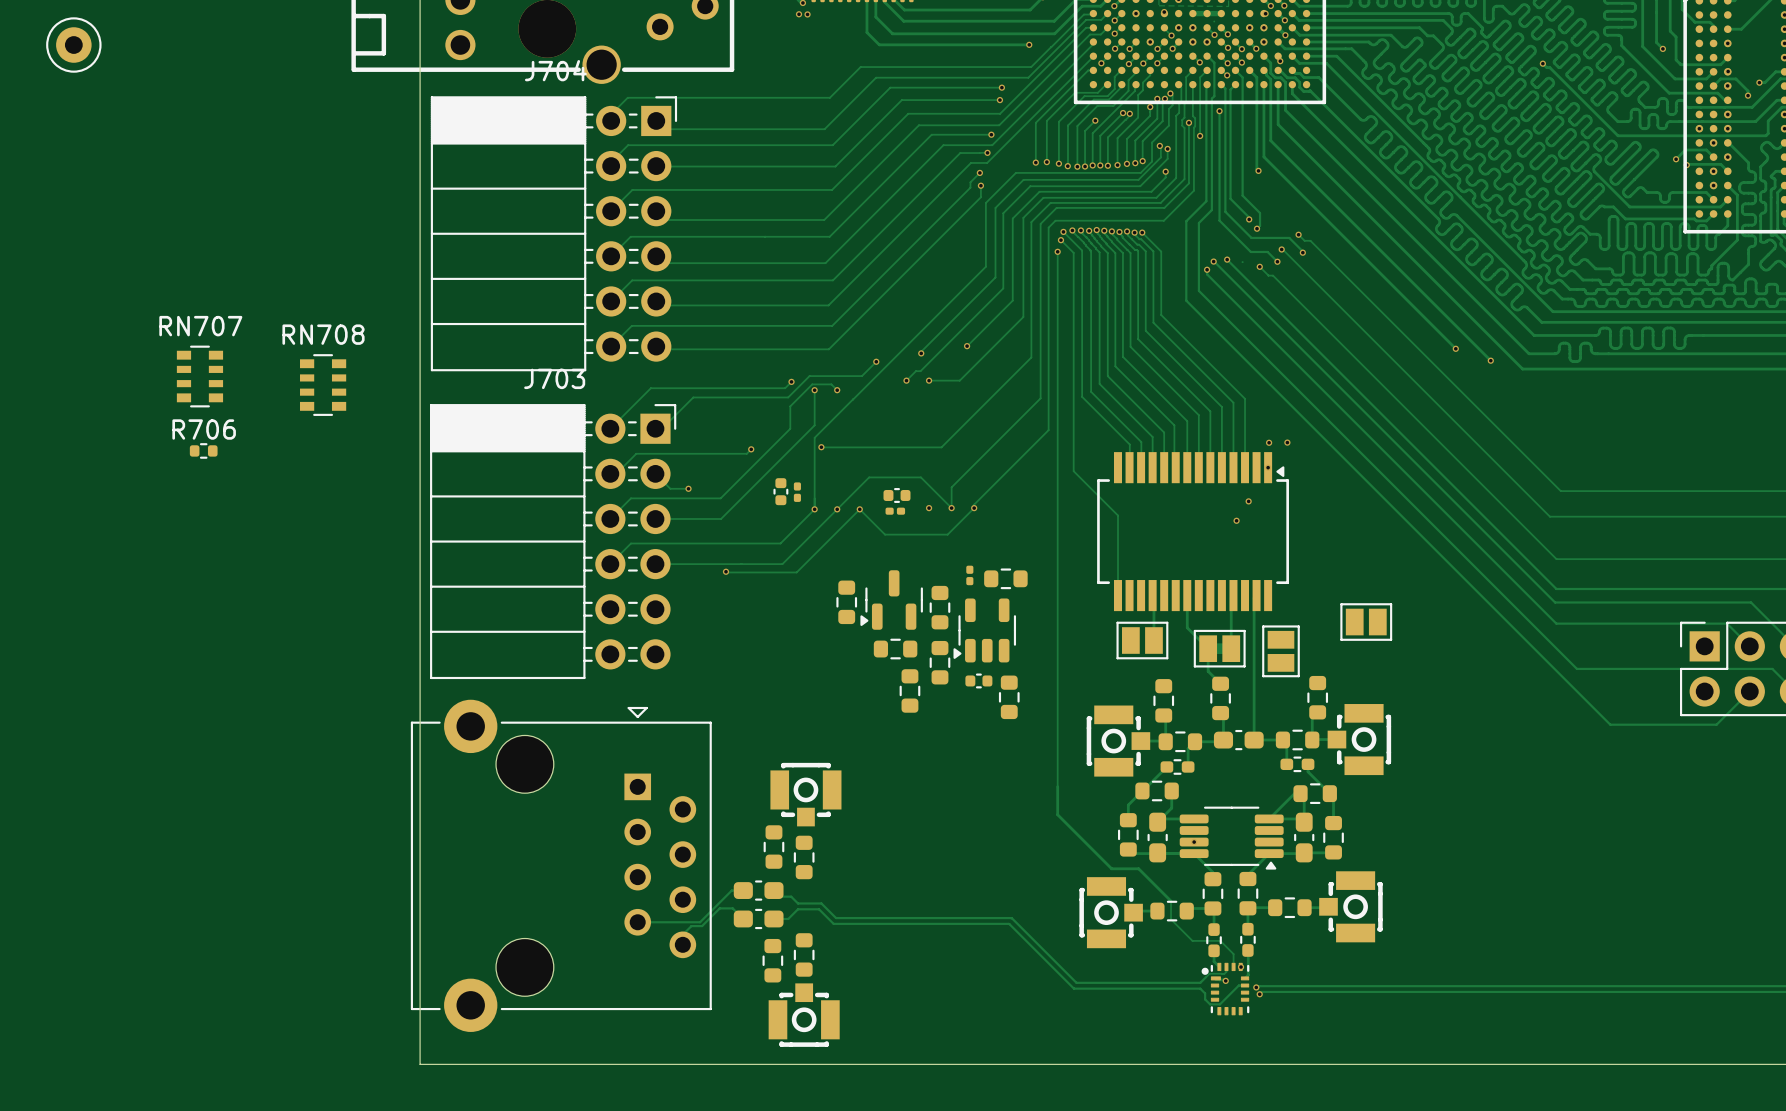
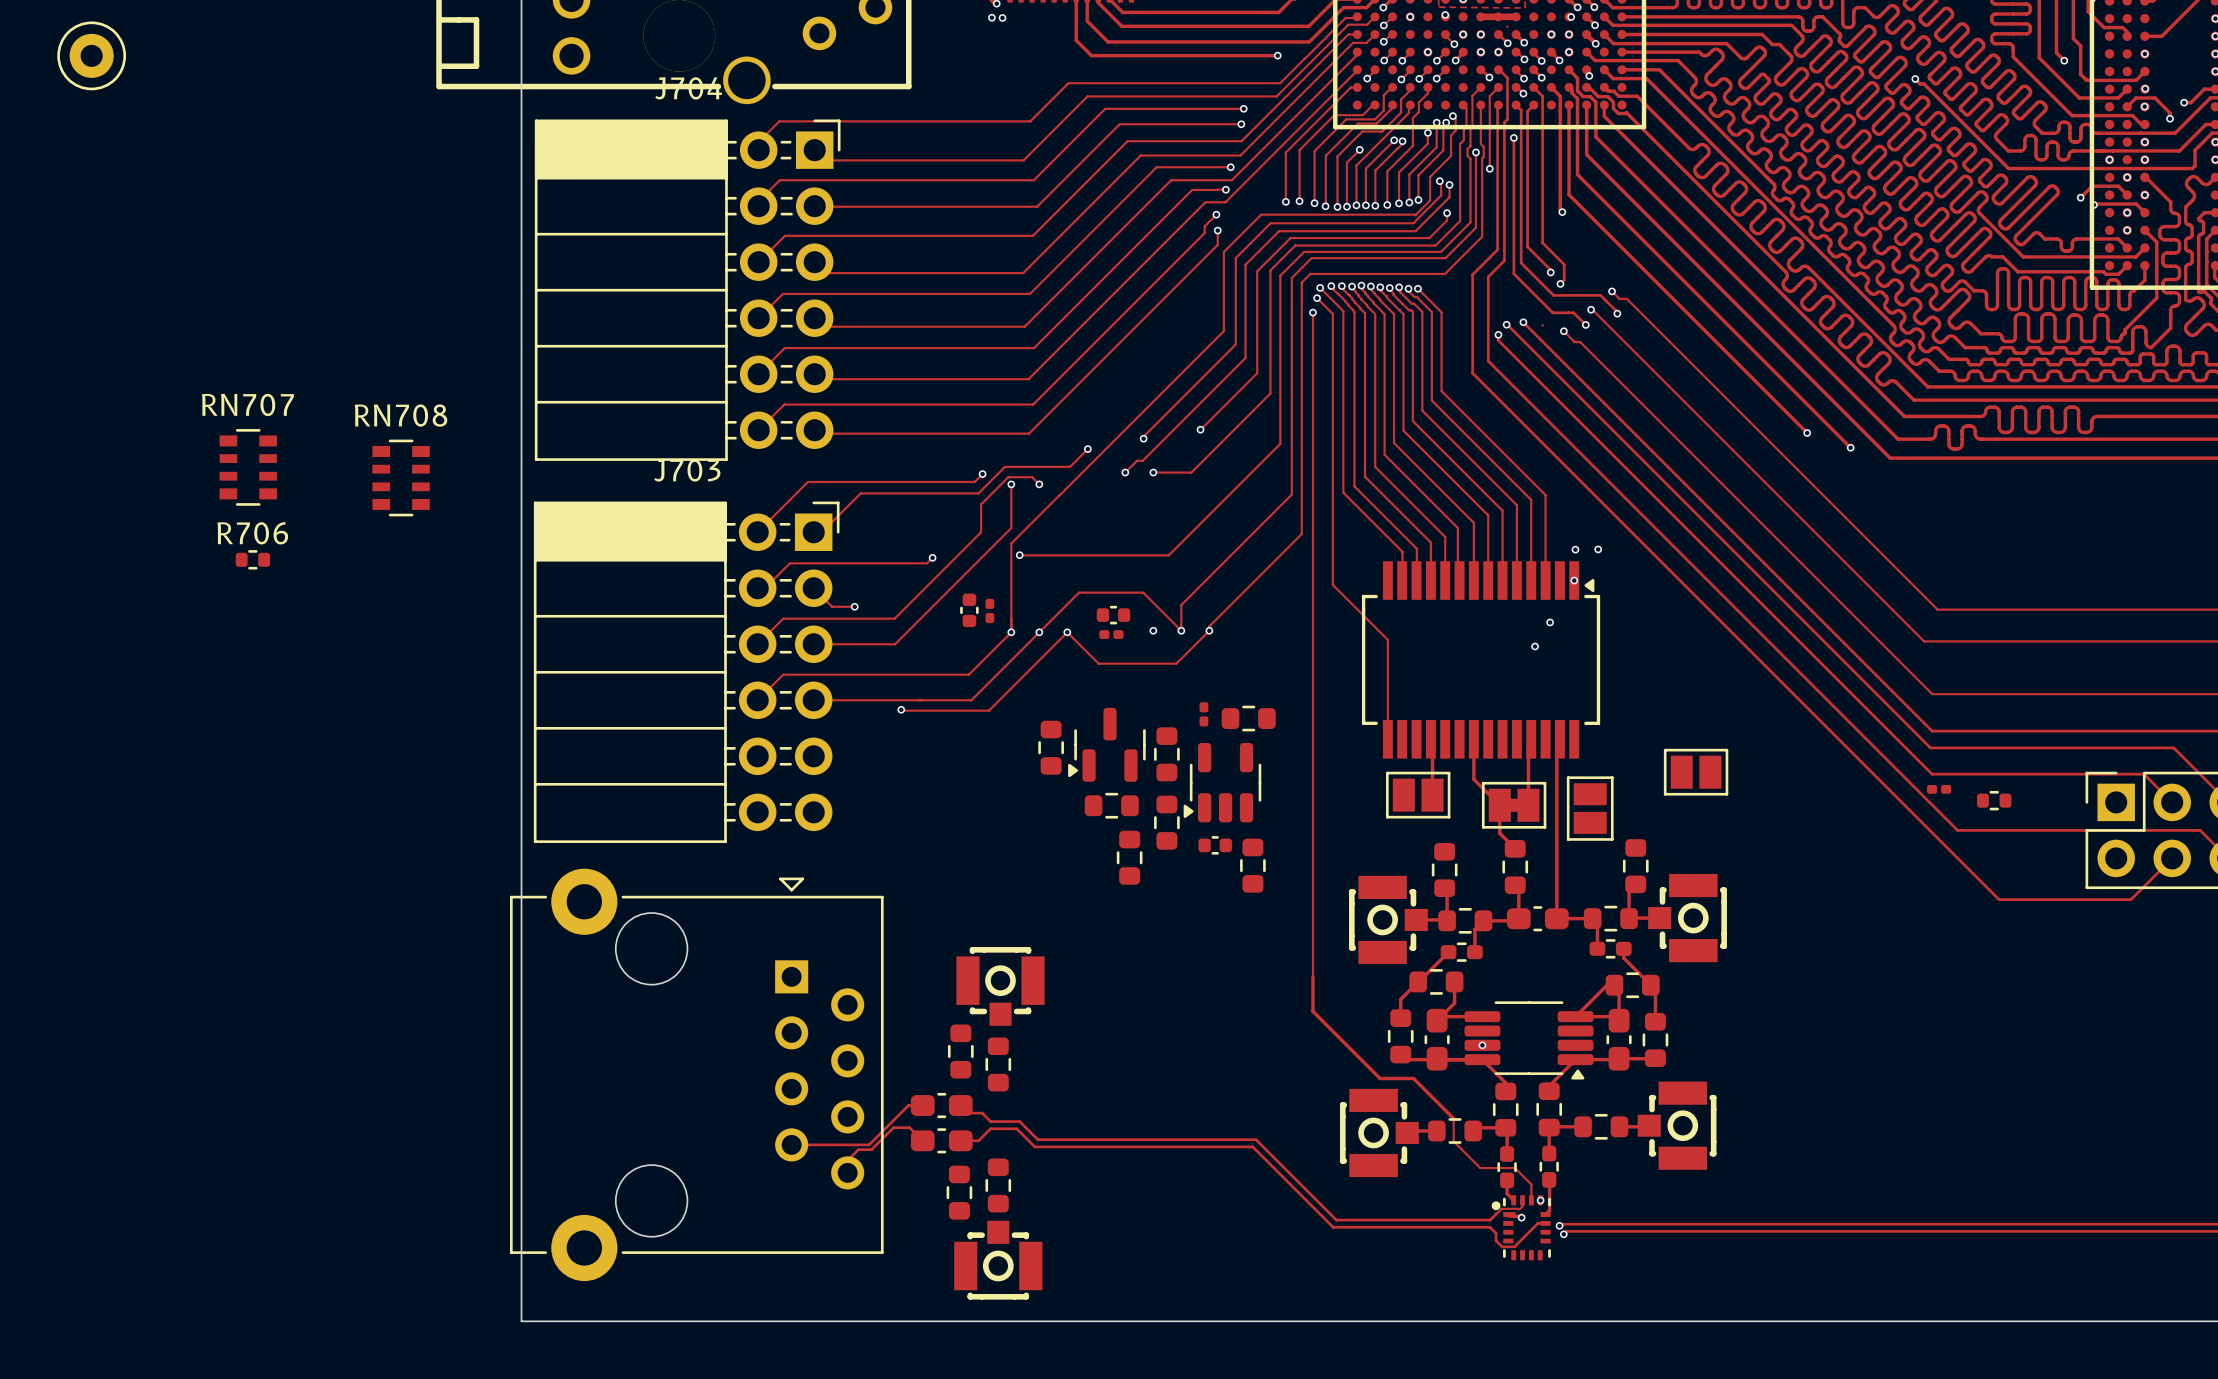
part: none -> (1939, 789)
part: none -> (1994, 800)

